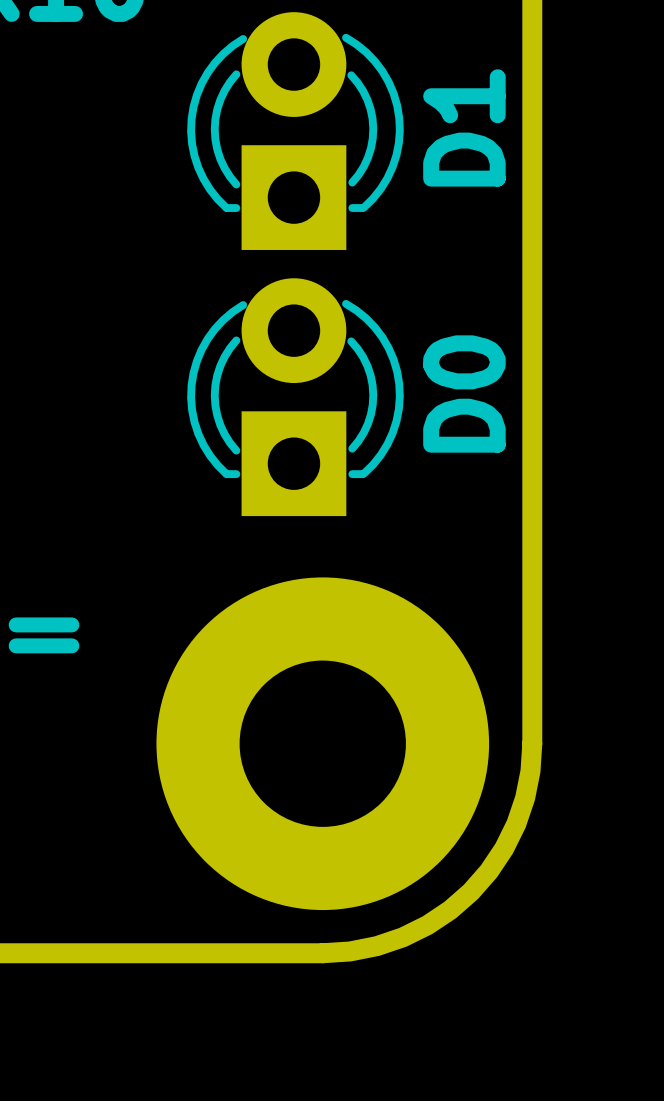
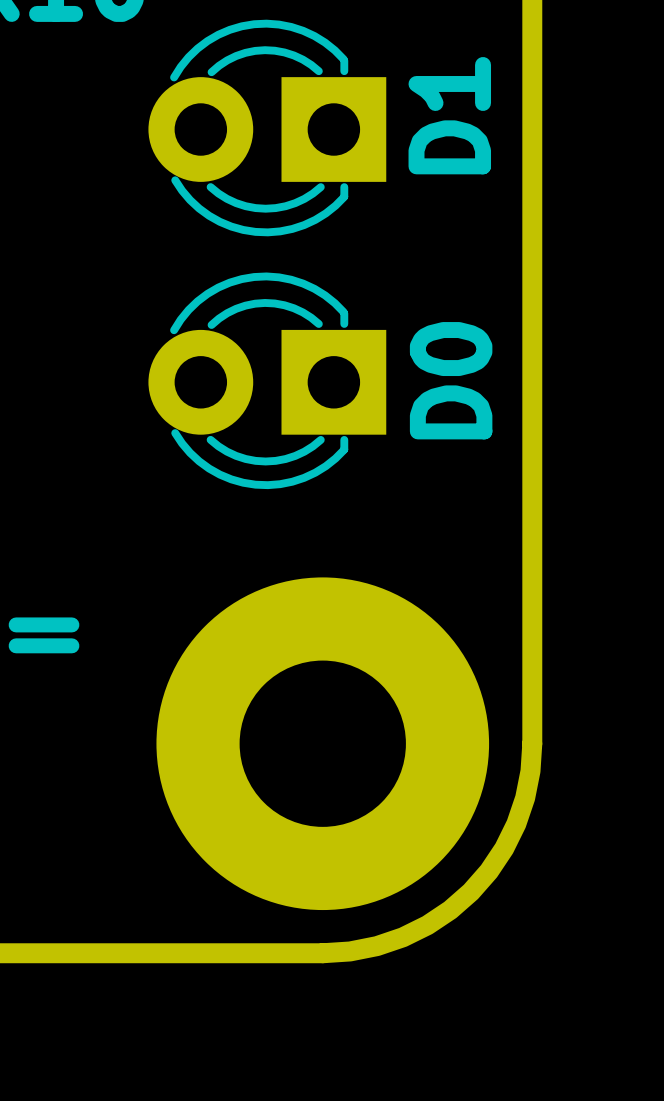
D1 rotation: 0° (295, 131) -> 90° counterclockwise (267, 128)
D0 rotation: 0° (295, 397) -> 90° counterclockwise (267, 380)

